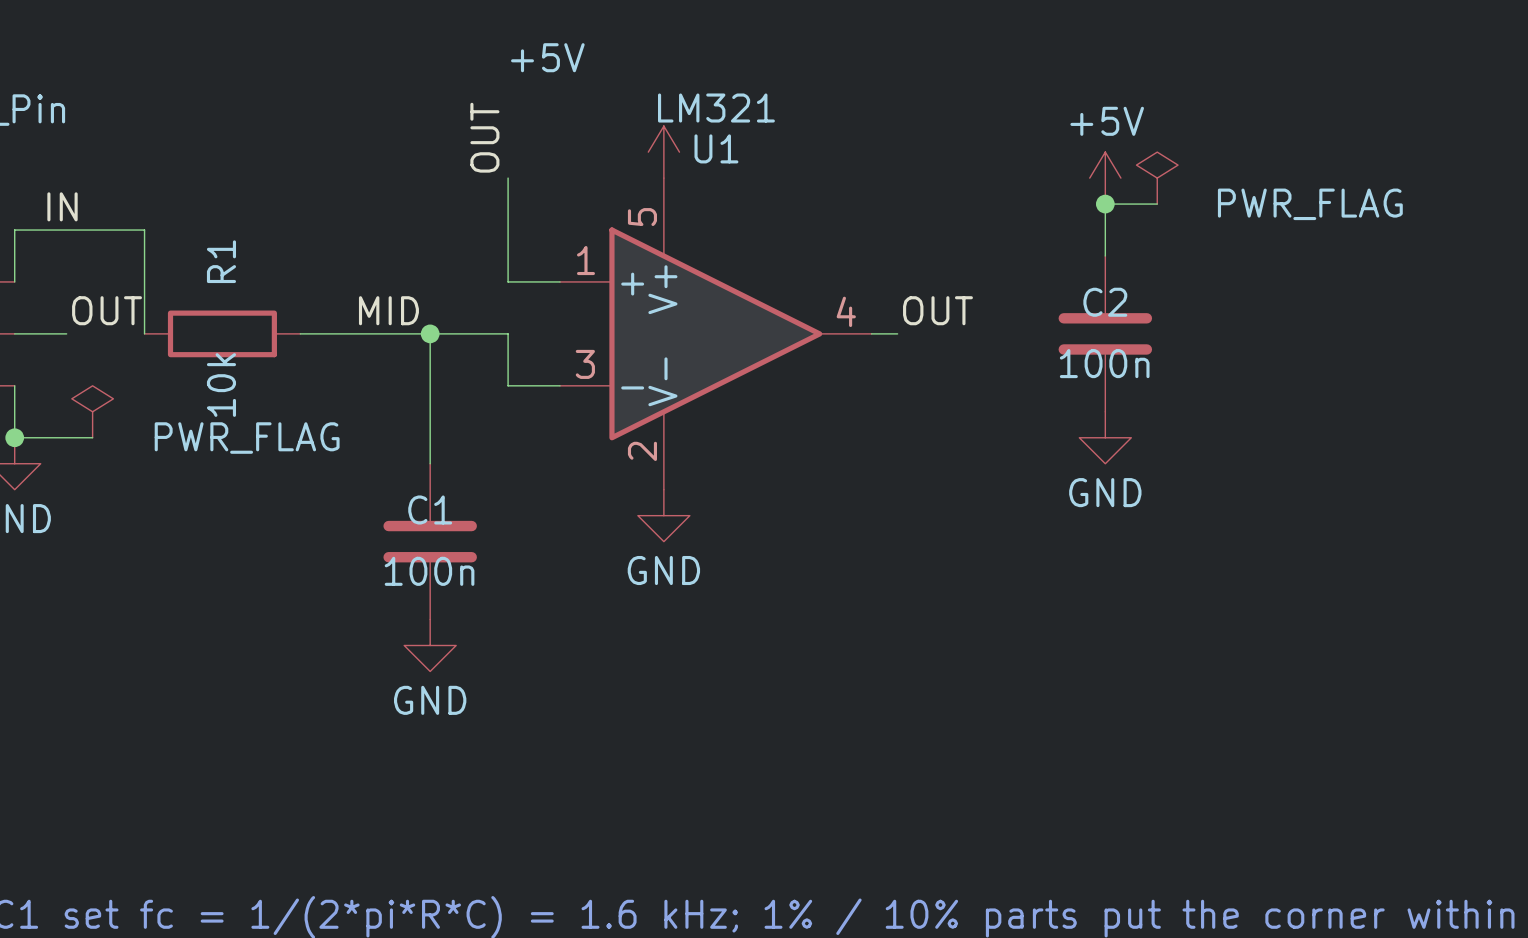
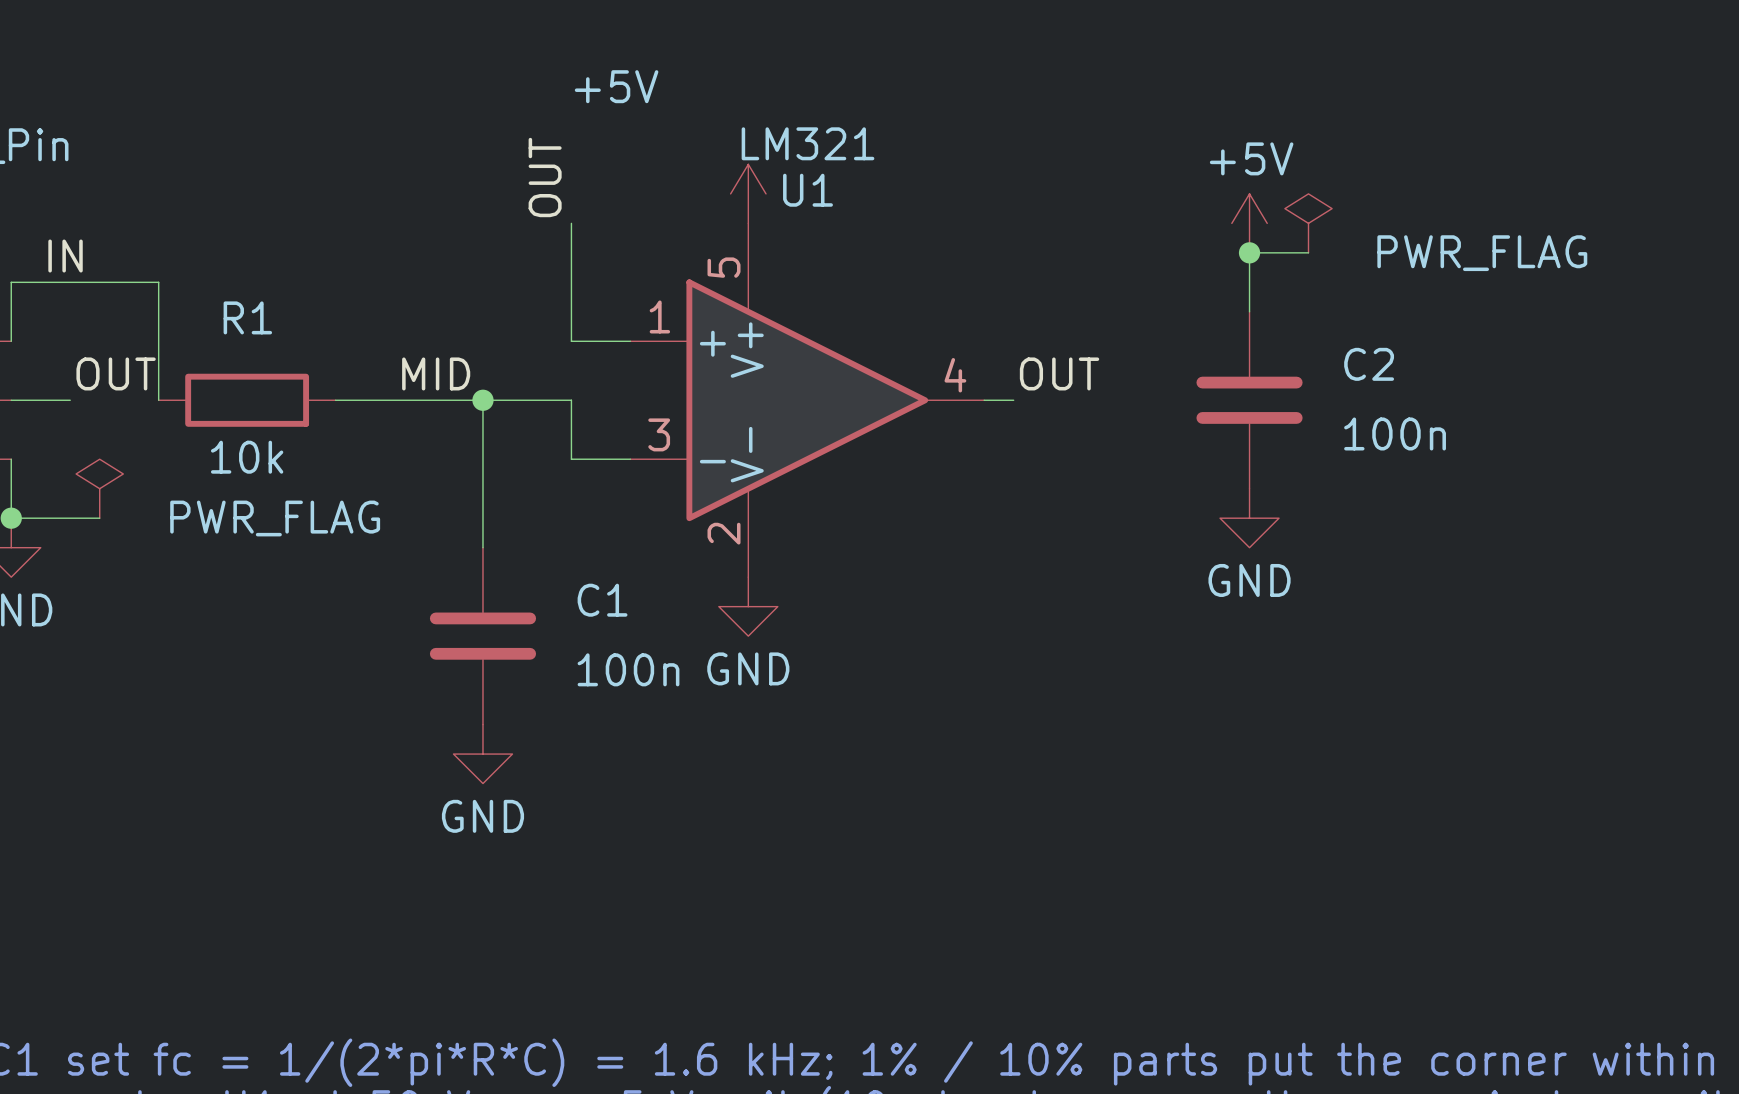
R1 name rotation: 0° (221, 261) -> 90° clockwise (247, 317)
C2 name position: C2 (1105, 302) -> C2 (1369, 364)
C2 value position: 100n (1104, 363) -> 100n (1395, 433)
R1 value rotation: 0° (221, 385) -> 90° clockwise (247, 457)
C1 name position: C1 (430, 509) -> C1 (602, 600)
C1 value position: 100n (429, 571) -> 100n (628, 669)

